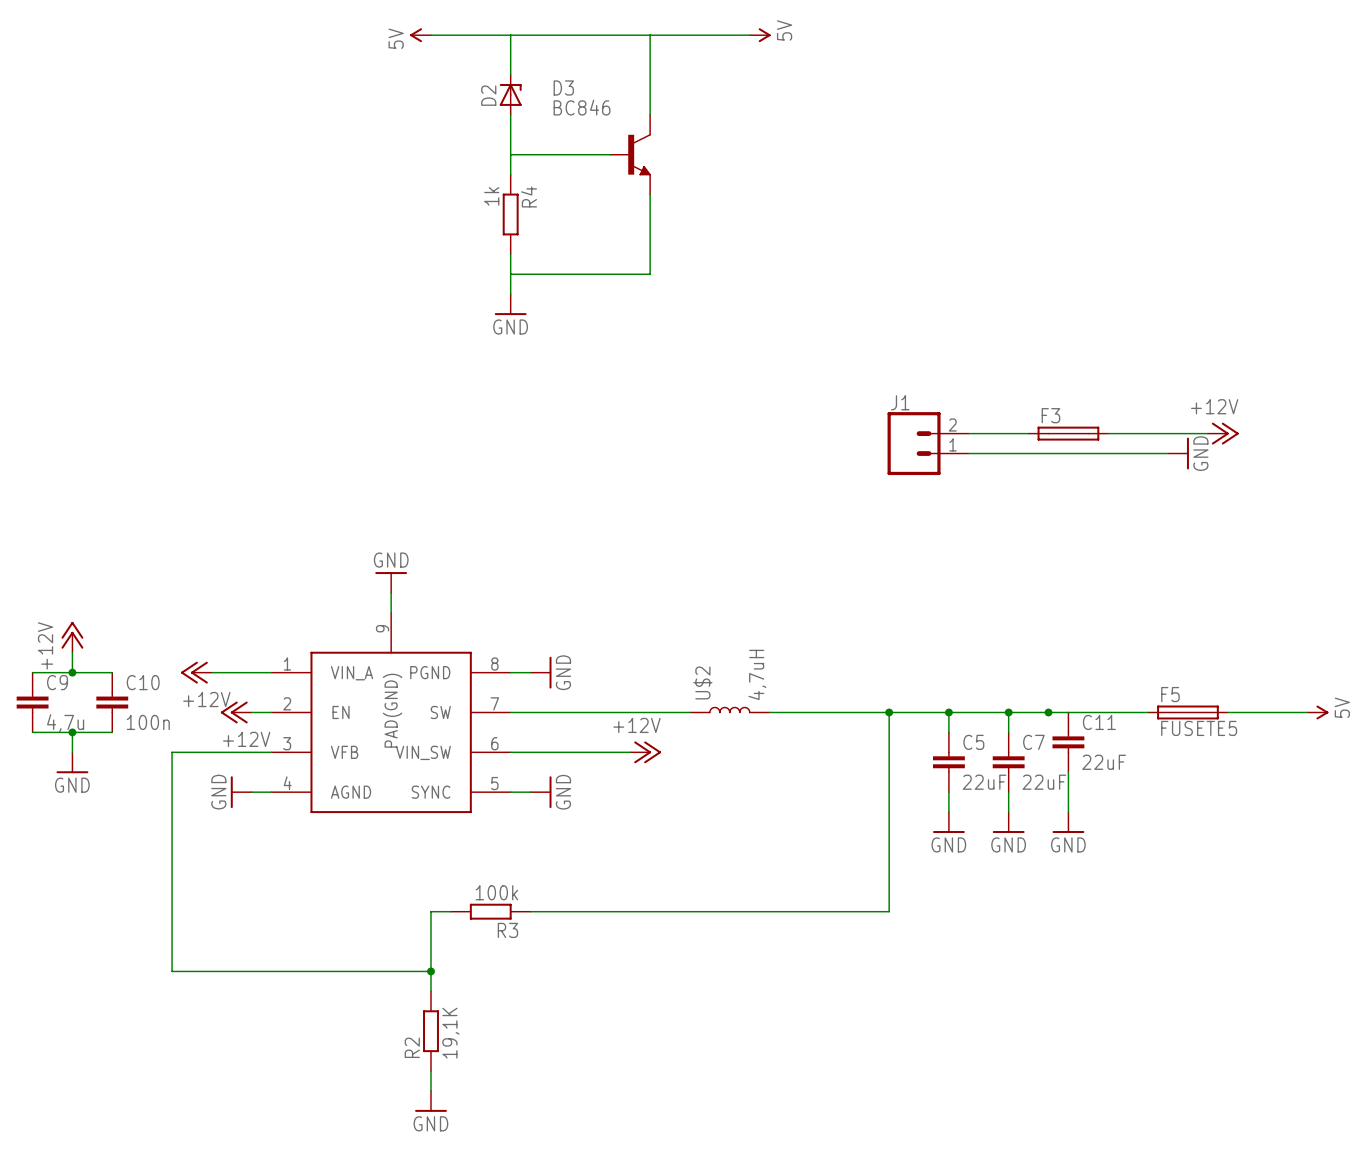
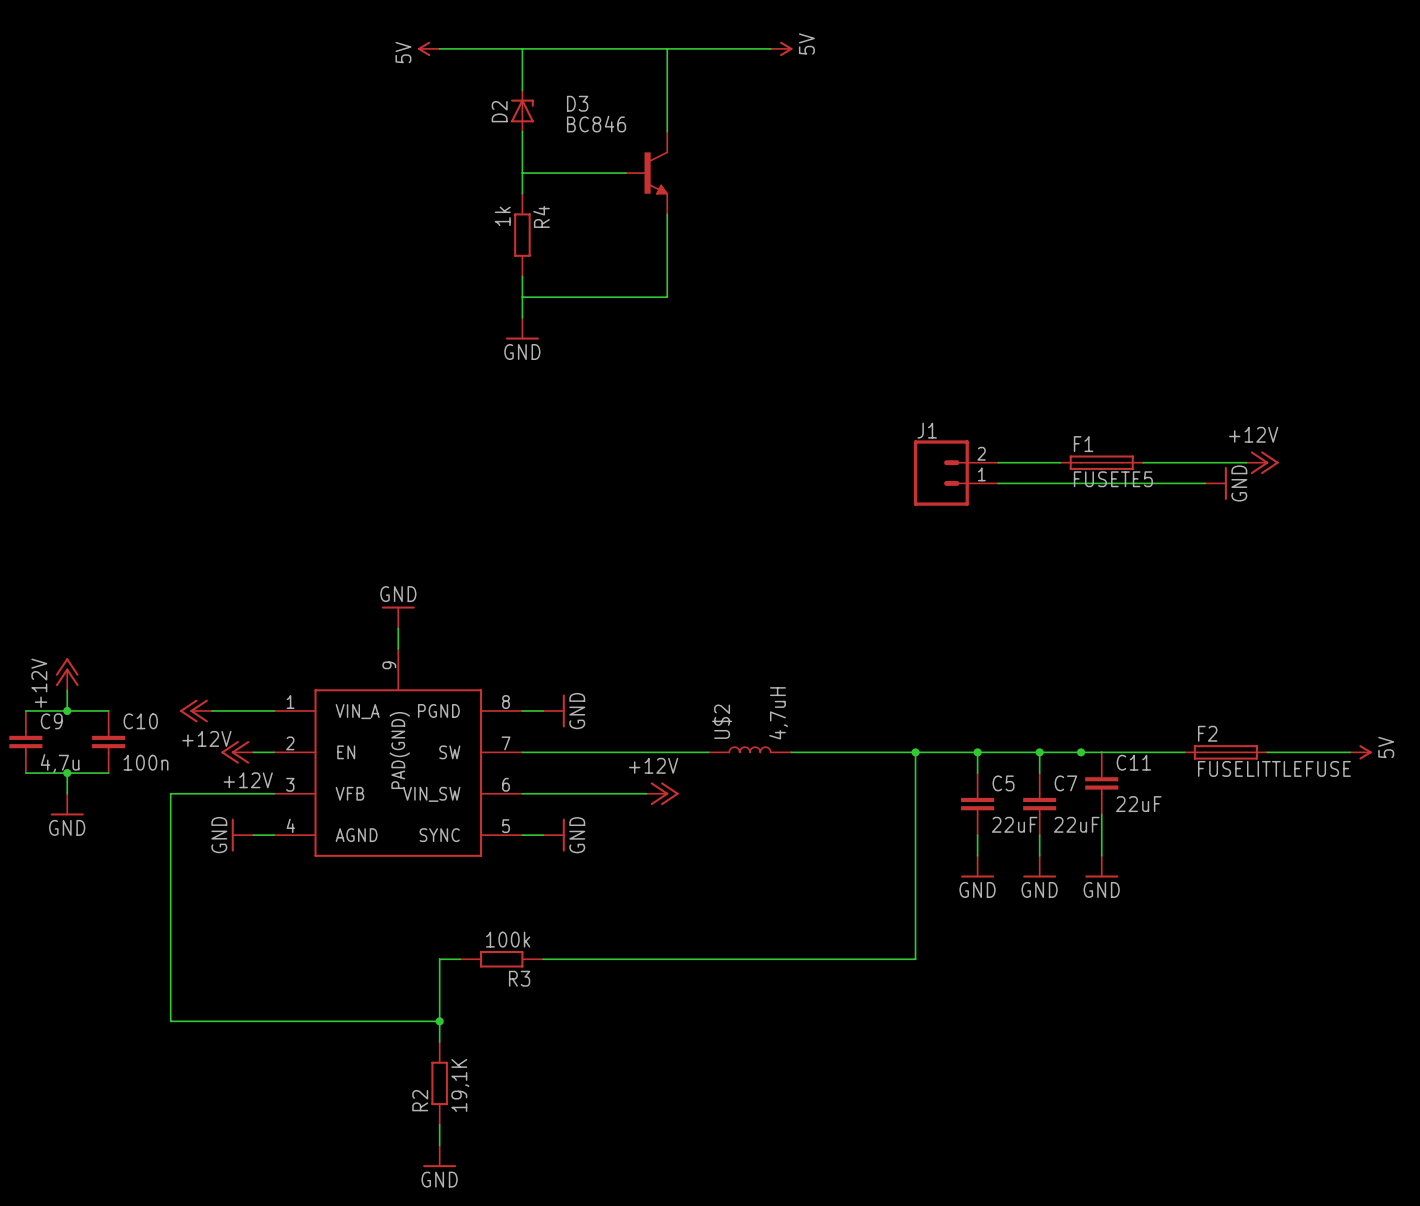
F3 name: F3 (1050, 415) -> F1 (1083, 444)
F3 value: none -> FUSETE5 (1113, 479)
F5 name: F5 (1170, 694) -> F2 (1207, 733)
F5 value: FUSETE5 (1199, 728) -> FUSELITTLEFUSE (1274, 768)

